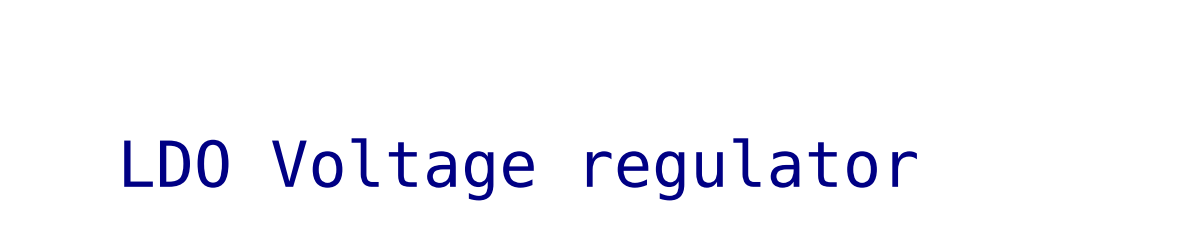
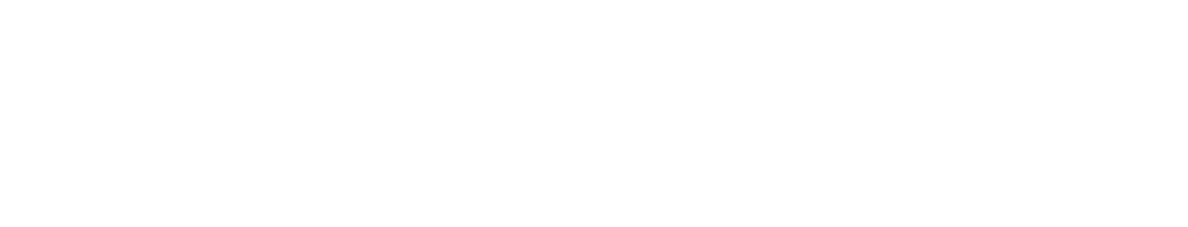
text: LDO Voltage regulator (520, 169) -> none

